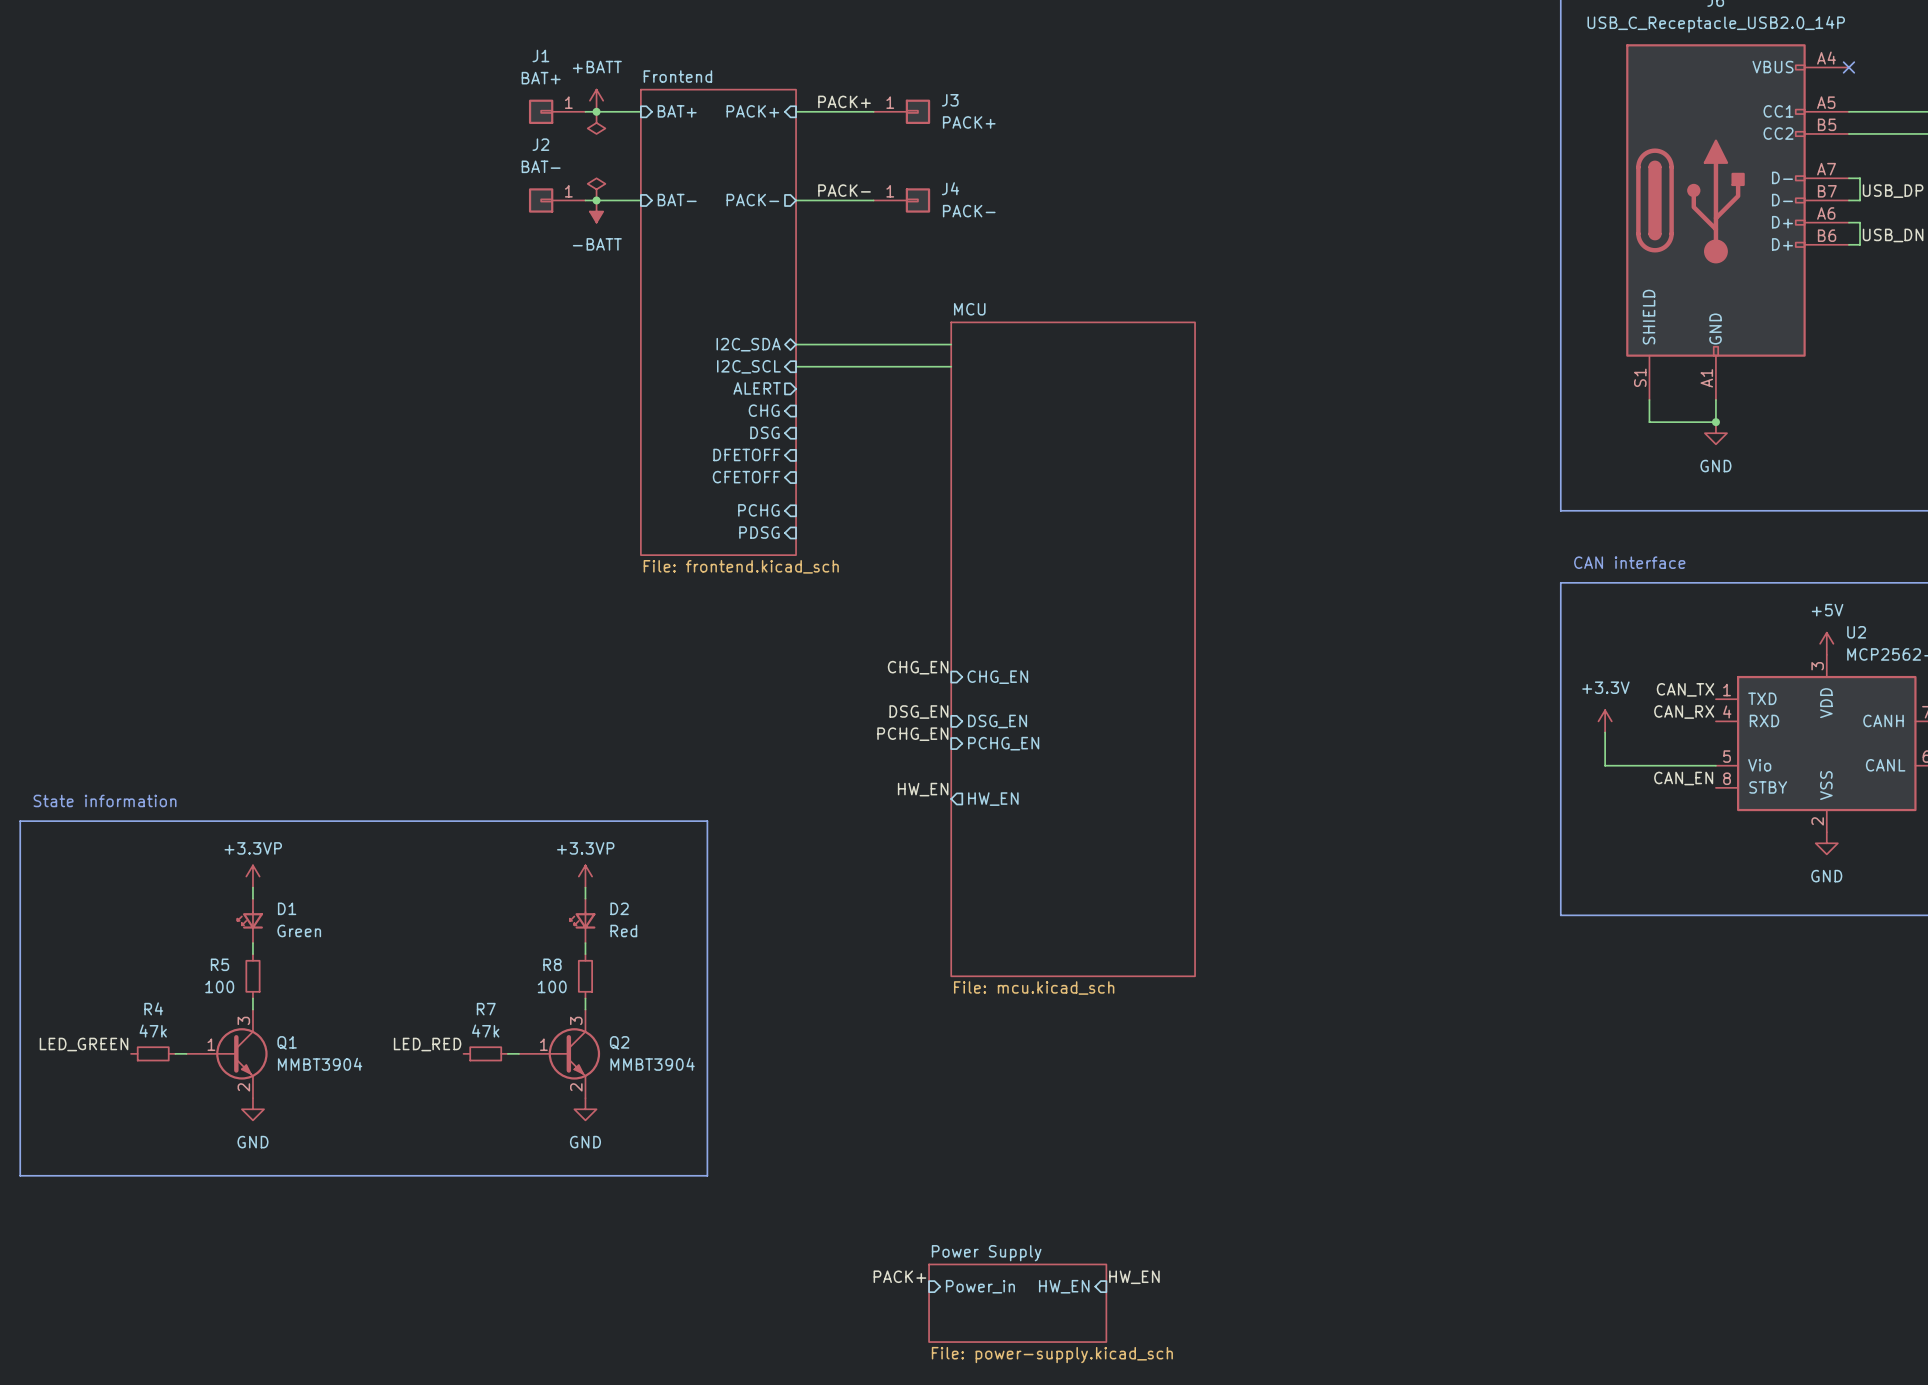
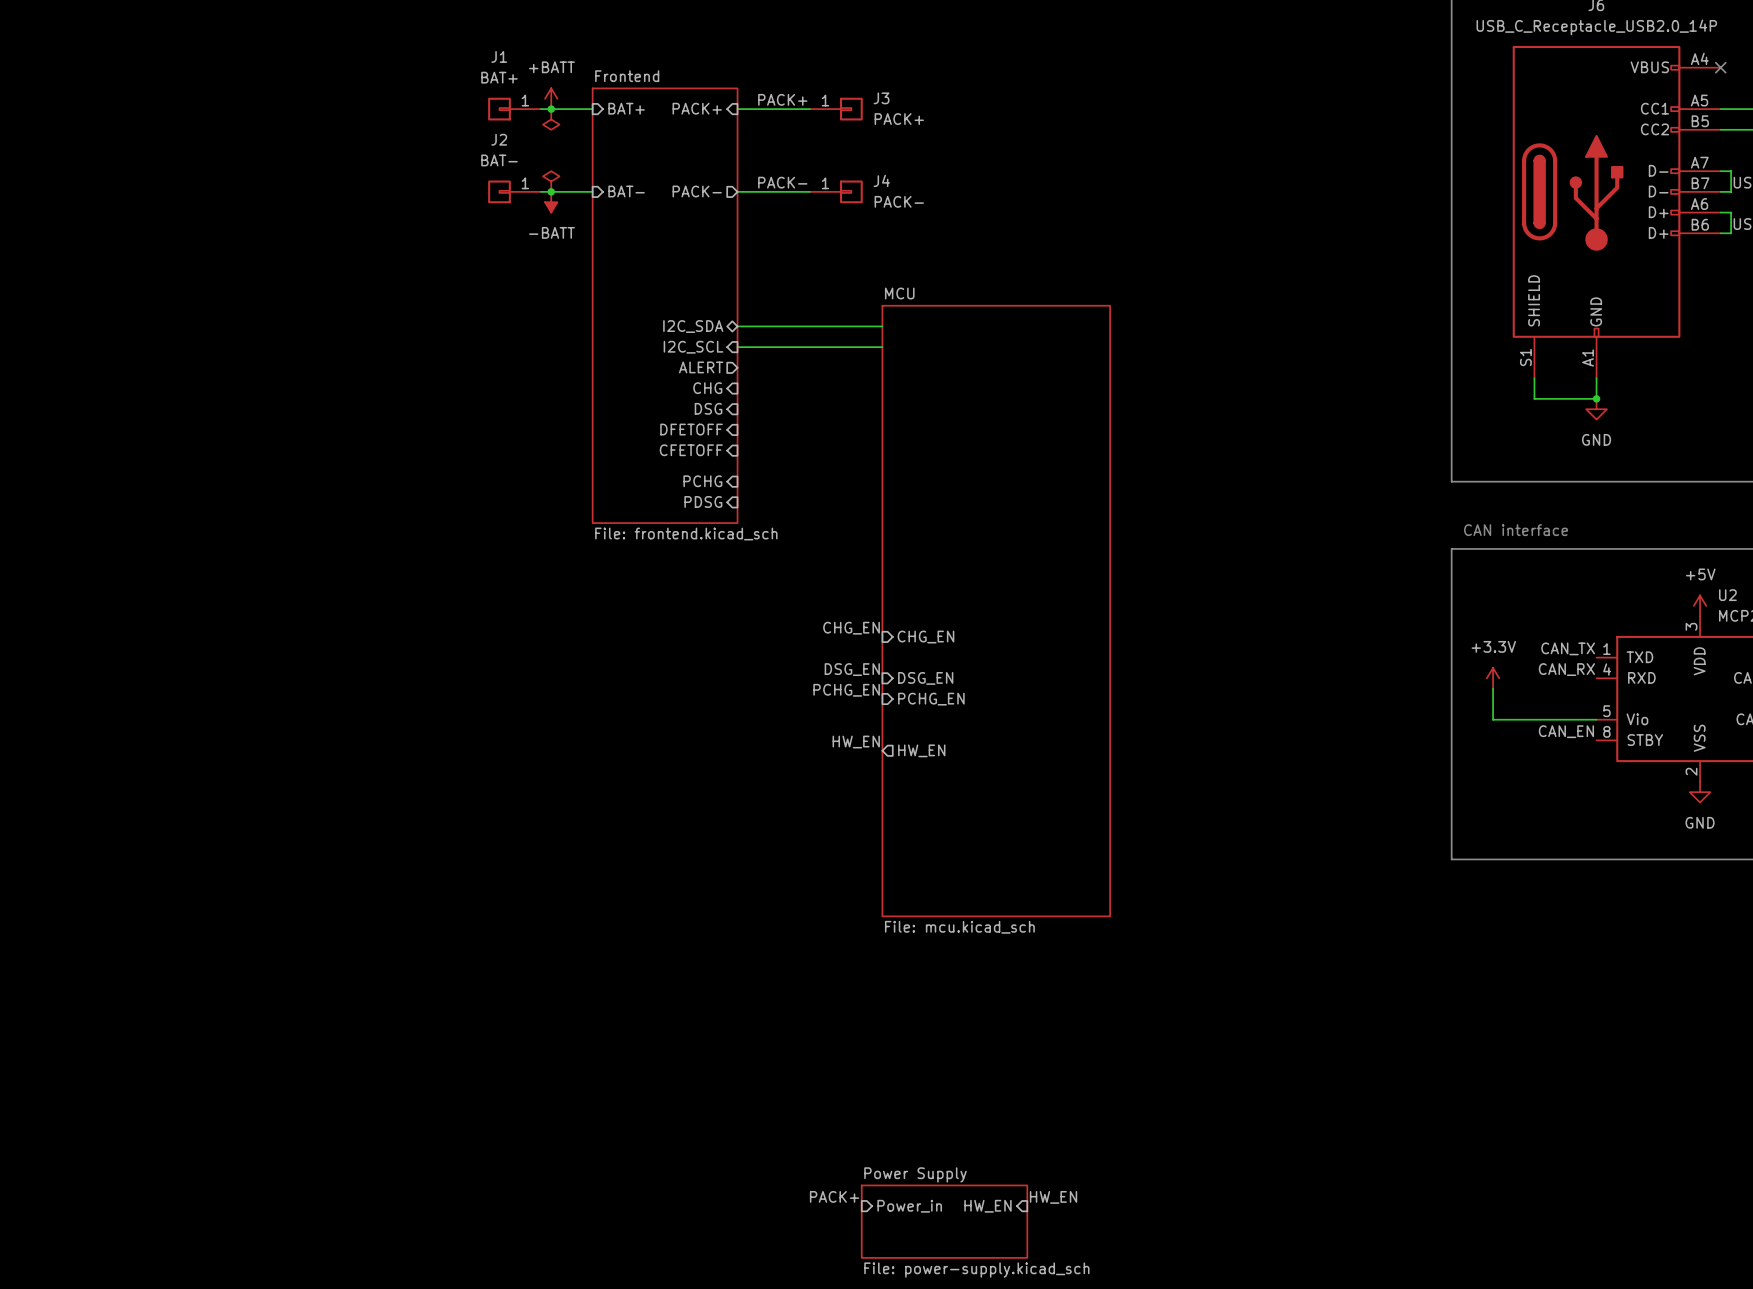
text: State information (105, 800) -> none
line: (20, 821) (20, 1175) (707, 1175) (707, 821) (20, 821) -> none
power symbol: +3.3VP (252, 876) -> none
power symbol: +3.3VP (585, 876) -> none
wire: (252, 887) (252, 898) -> none
wire: (585, 887) (585, 898) -> none
D1: Green (250, 920) -> none
D2: Red (582, 920) -> none
wire: (252, 943) (252, 954) -> none
wire: (585, 943) (585, 954) -> none
R5: 100 (252, 976) -> none
R8: 100 (585, 976) -> none
wire: (252, 998) (252, 1009) -> none
wire: (585, 998) (585, 1009) -> none
label: LED_GREEN (84, 1044) -> none
label: LED_RED (427, 1044) -> none
R4: 47k (153, 1053) -> none
wire: (175, 1053) (186, 1053) -> none
Q1: MMBT3904 (227, 1053) -> none
R7: 47k (485, 1053) -> none
wire: (507, 1053) (518, 1053) -> none
Q2: MMBT3904 (559, 1053) -> none
power symbol: GND (252, 1109) -> none
power symbol: GND (585, 1109) -> none

